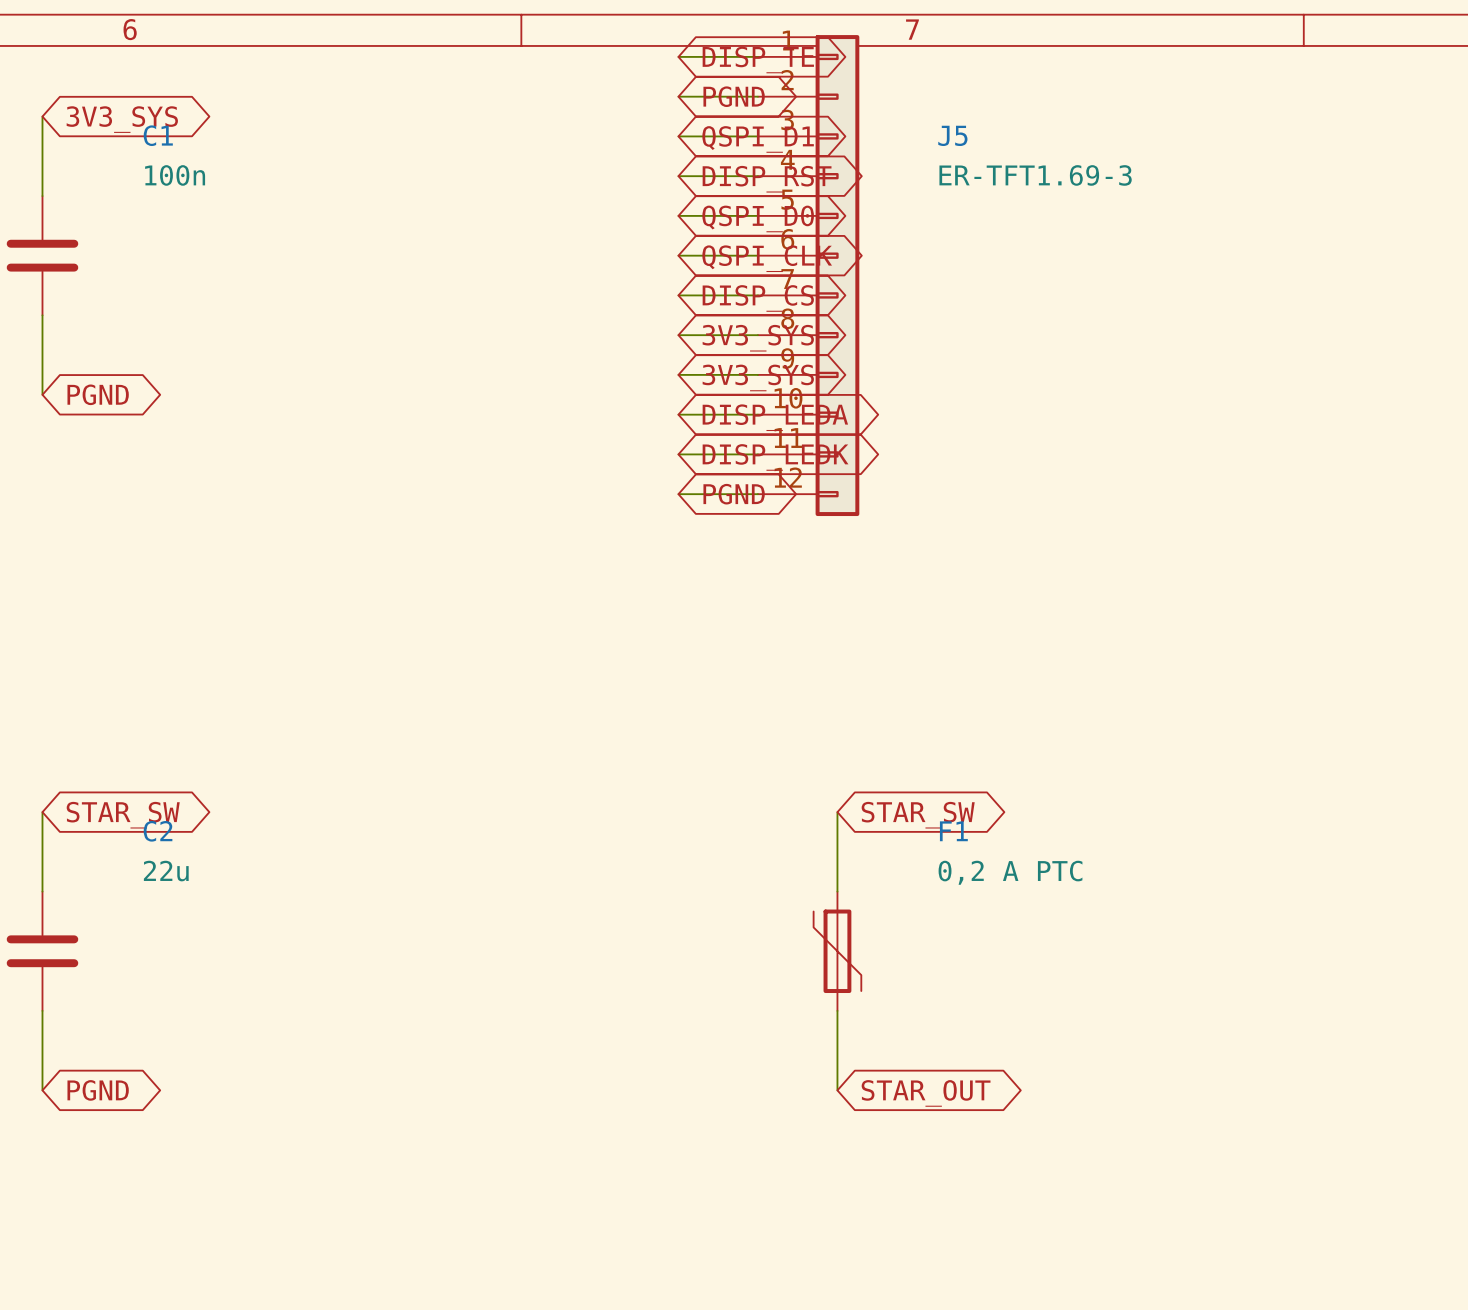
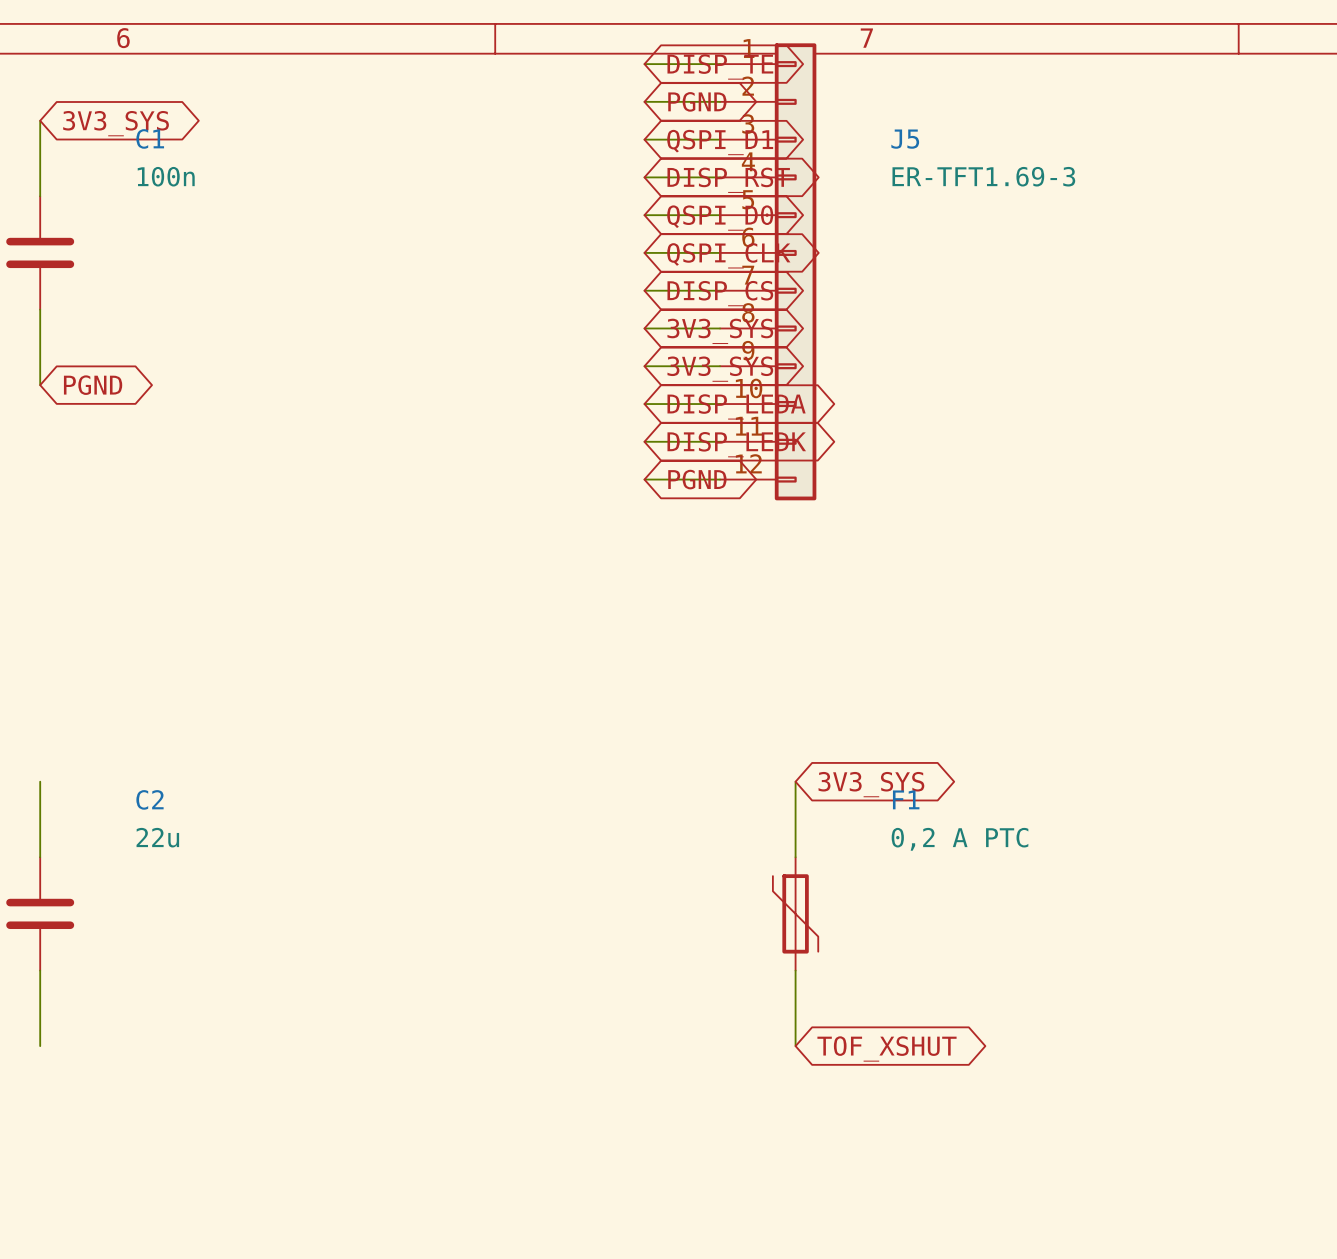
global label: STAR_SW (123, 815) -> none
global label: STAR_SW (918, 815) -> 3V3_SYS (871, 784)
global label: PGND (98, 1090) -> none
global label: STAR_OUT (926, 1093) -> TOF_XSHUT (886, 1048)

